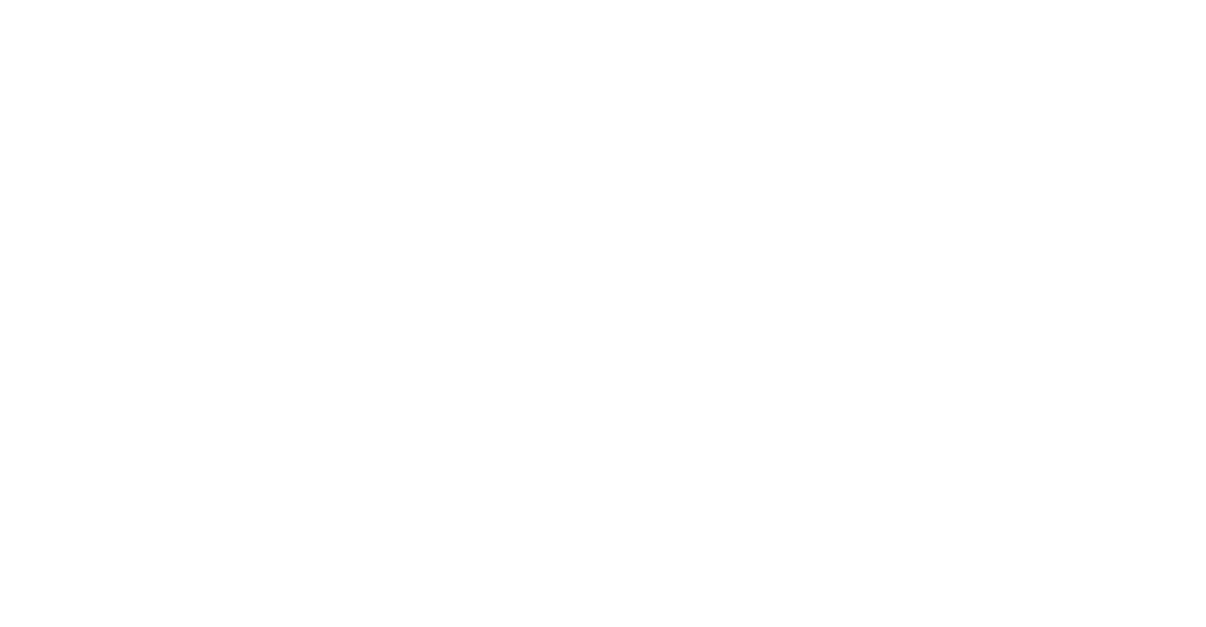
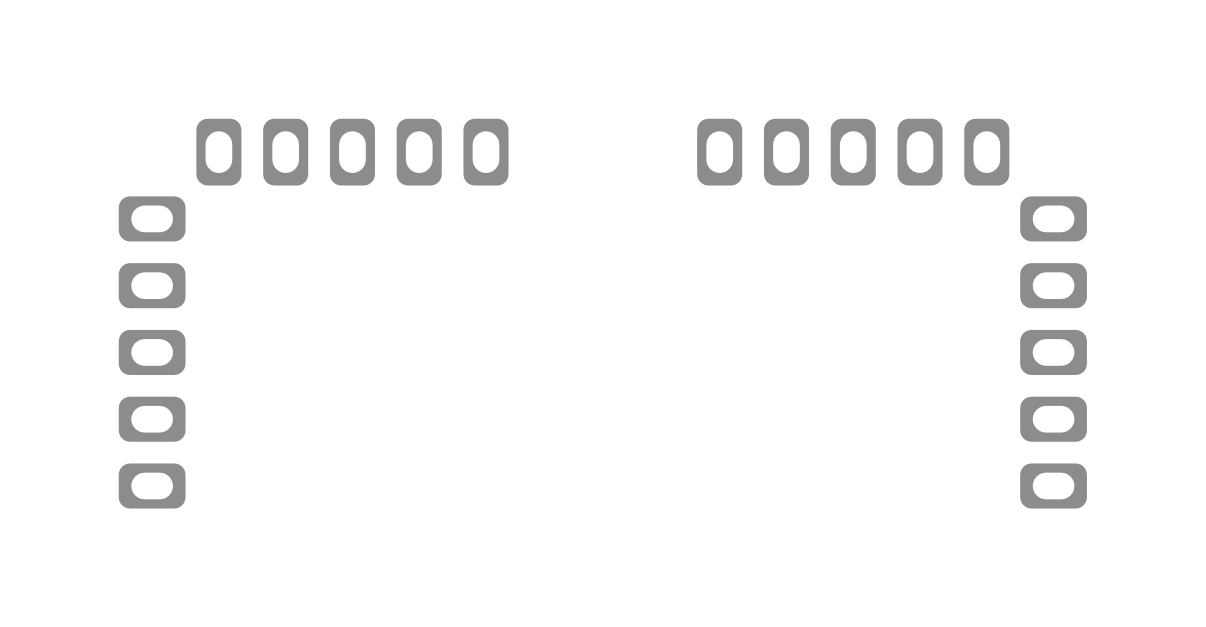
part: none -> (352, 152)
part: none -> (853, 152)
part: none -> (152, 352)
part: none -> (1053, 352)

